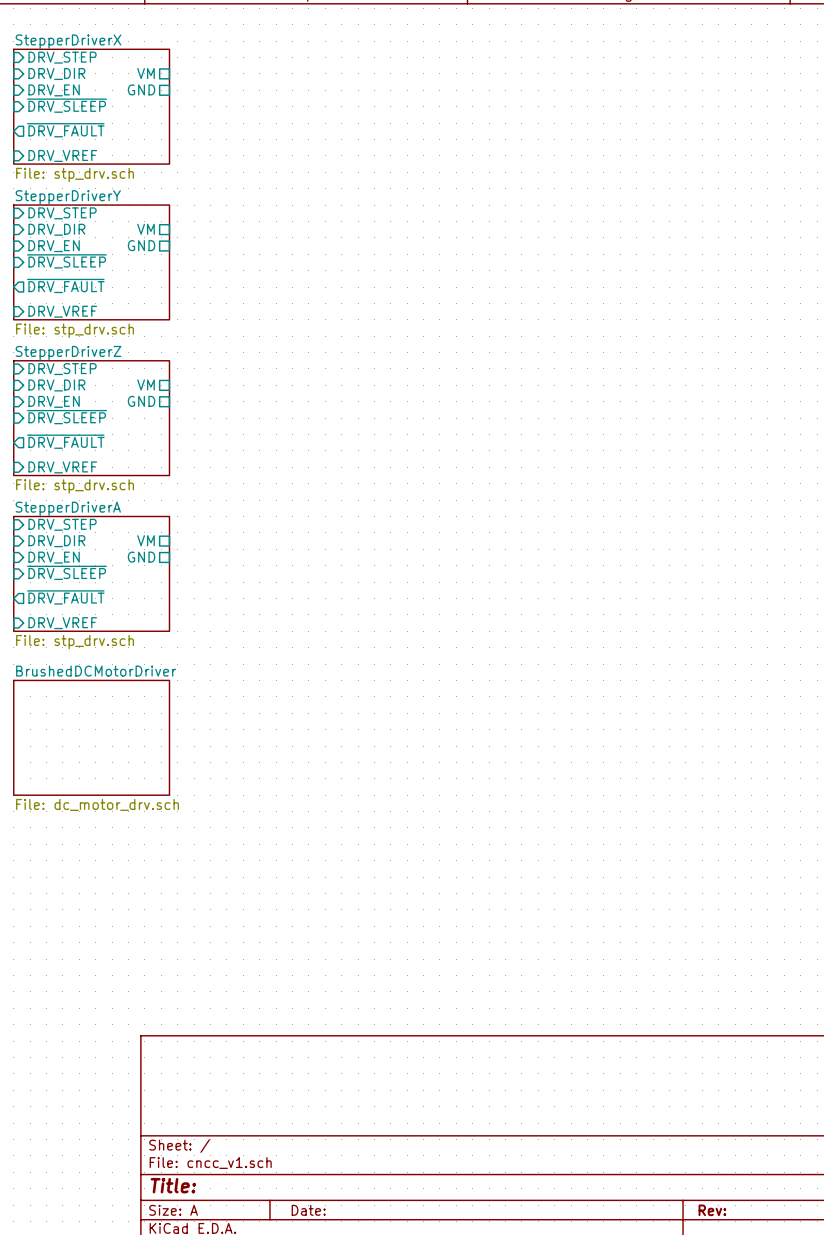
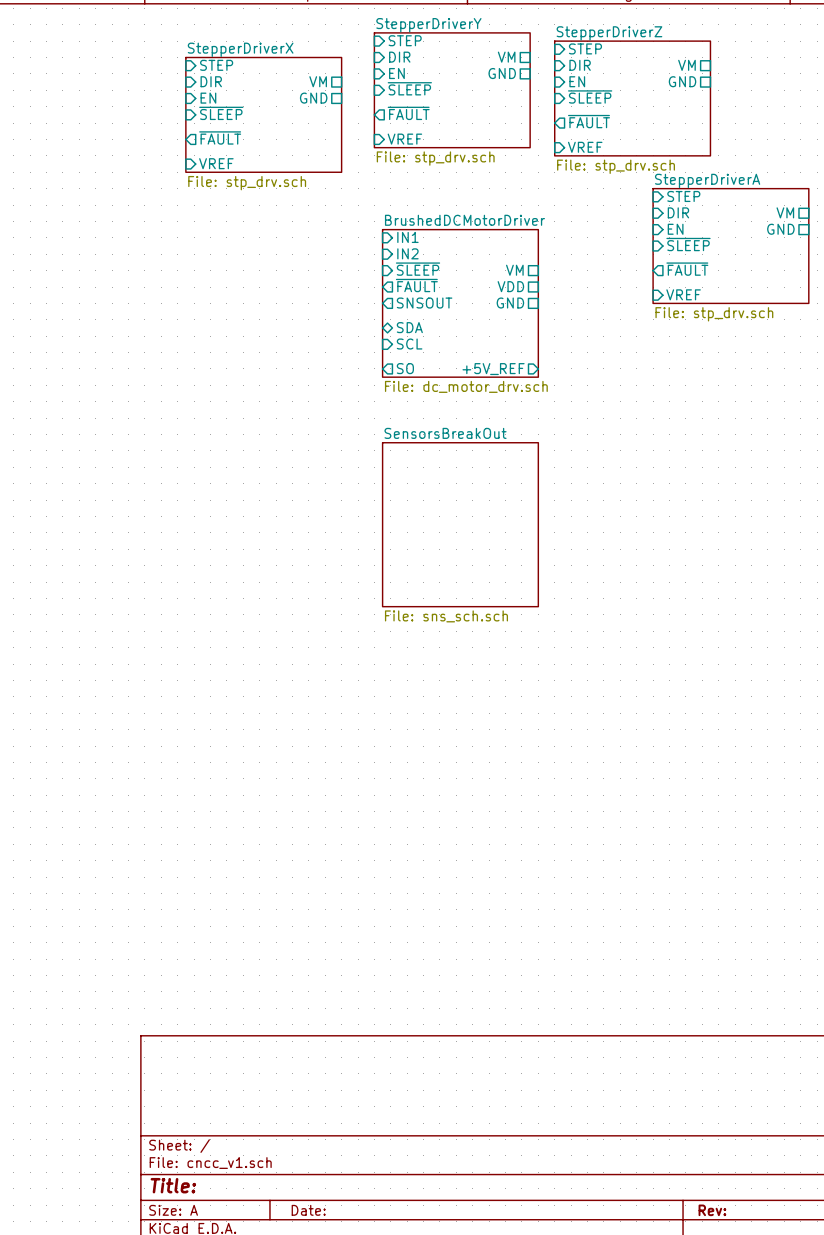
sheet pin: none -> STEP (405, 40)
sheet pin: none -> STEP (585, 48)
sheet pin: DRV_STEP (62, 57) -> none
sheet pin: none -> DIR (399, 57)
sheet pin: none -> VM (506, 57)
sheet pin: none -> STEP (216, 65)
sheet pin: none -> DIR (580, 65)
sheet pin: none -> VM (686, 65)
sheet pin: DRV_DIR (56, 73) -> none
sheet pin: VM (146, 73) -> none
sheet pin: none -> EN (396, 73)
sheet pin: none -> GND (502, 73)
sheet pin: none -> DIR (211, 81)
sheet pin: none -> VM (318, 81)
sheet pin: none -> EN (577, 81)
sheet pin: none -> GND (682, 81)
sheet pin: none -> ~{SLEEP} (409, 88)
sheet pin: GND (141, 89) -> none
sheet pin: DRV_EN (54, 90) -> none
sheet StepperDriverY: none -> File: stp_drv.sch (452, 90)
sheet pin: none -> ~{SLEEP} (590, 96)
sheet pin: none -> EN (208, 98)
sheet pin: none -> GND (313, 98)
sheet StepperDriverZ: none -> File: stp_drv.sch (632, 98)
sheet pin: ~{DRV_SLEEP} (66, 105) -> none
sheet StepperDriverX: File: stp_drv.sch (91, 106) -> none
sheet pin: none -> ~{SLEEP} (221, 113)
sheet pin: none -> ~{FAULT} (408, 113)
sheet StepperDriverX: none -> File: stp_drv.sch (263, 114)
sheet pin: none -> ~{FAULT} (589, 121)
sheet pin: ~{DRV_FAULT} (65, 130) -> none
sheet pin: none -> ~{FAULT} (220, 137)
sheet pin: none -> VREF (404, 139)
sheet pin: none -> VREF (585, 147)
sheet pin: DRV_VREF (62, 155) -> none
sheet pin: none -> VREF (216, 163)
sheet pin: none -> STEP (683, 196)
sheet pin: none -> DIR (678, 212)
sheet pin: none -> VM (785, 212)
sheet pin: DRV_STEP (62, 213) -> none
sheet pin: DRV_DIR (56, 229) -> none
sheet pin: VM (146, 229) -> none
sheet pin: none -> EN (675, 229)
sheet pin: none -> GND (780, 229)
sheet pin: none -> IN1 (407, 237)
sheet pin: none -> ~{SLEEP} (688, 244)
sheet pin: GND (141, 245) -> none
sheet pin: DRV_EN (54, 246) -> none
sheet StepperDriverA: none -> File: stp_drv.sch (730, 246)
sheet pin: none -> IN2 (407, 253)
sheet pin: ~{DRV_SLEEP} (66, 261) -> none
sheet StepperDriverY: File: stp_drv.sch (91, 262) -> none
sheet pin: none -> ~{SLEEP} (418, 269)
sheet pin: none -> ~{FAULT} (687, 269)
sheet pin: none -> VM (514, 270)
sheet pin: ~{DRV_FAULT} (65, 285) -> none
sheet pin: none -> ~{FAULT} (416, 285)
sheet pin: none -> VDD (510, 286)
sheet pin: none -> VREF (683, 294)
sheet pin: none -> SNSOUT (424, 303)
sheet BrushedDCMotorDriver: none -> File: dc_motor_drv.sch (460, 303)
sheet pin: none -> GND (510, 303)
sheet pin: DRV_VREF (62, 311) -> none
sheet pin: none -> SDA (409, 327)
sheet pin: none -> SCL (409, 344)
sheet pin: none -> SO (405, 368)
sheet pin: DRV_STEP (62, 369) -> none
sheet pin: none -> +5V_REF (493, 369)
sheet pin: VM (146, 384) -> none
sheet pin: DRV_DIR (56, 385) -> none
sheet pin: DRV_EN (54, 401) -> none
sheet pin: GND (141, 401) -> none
sheet pin: ~{DRV_SLEEP} (66, 417) -> none
sheet StepperDriverZ: File: stp_drv.sch (91, 418) -> none
sheet pin: ~{DRV_FAULT} (65, 441) -> none
sheet pin: DRV_VREF (62, 467) -> none
sheet pin: DRV_STEP (62, 524) -> none
sheet SensorsBreakOut: none -> File: sns_sch.sch (460, 524)
sheet pin: VM (146, 540) -> none
sheet pin: DRV_DIR (56, 541) -> none
sheet pin: DRV_EN (54, 557) -> none
sheet pin: GND (141, 557) -> none
sheet pin: ~{DRV_SLEEP} (66, 572) -> none
sheet StepperDriverA: File: stp_drv.sch (91, 573) -> none
sheet pin: ~{DRV_FAULT} (65, 597) -> none
sheet pin: DRV_VREF (62, 623) -> none
sheet BrushedDCMotorDriver: File: dc_motor_drv.sch (91, 737) -> none

